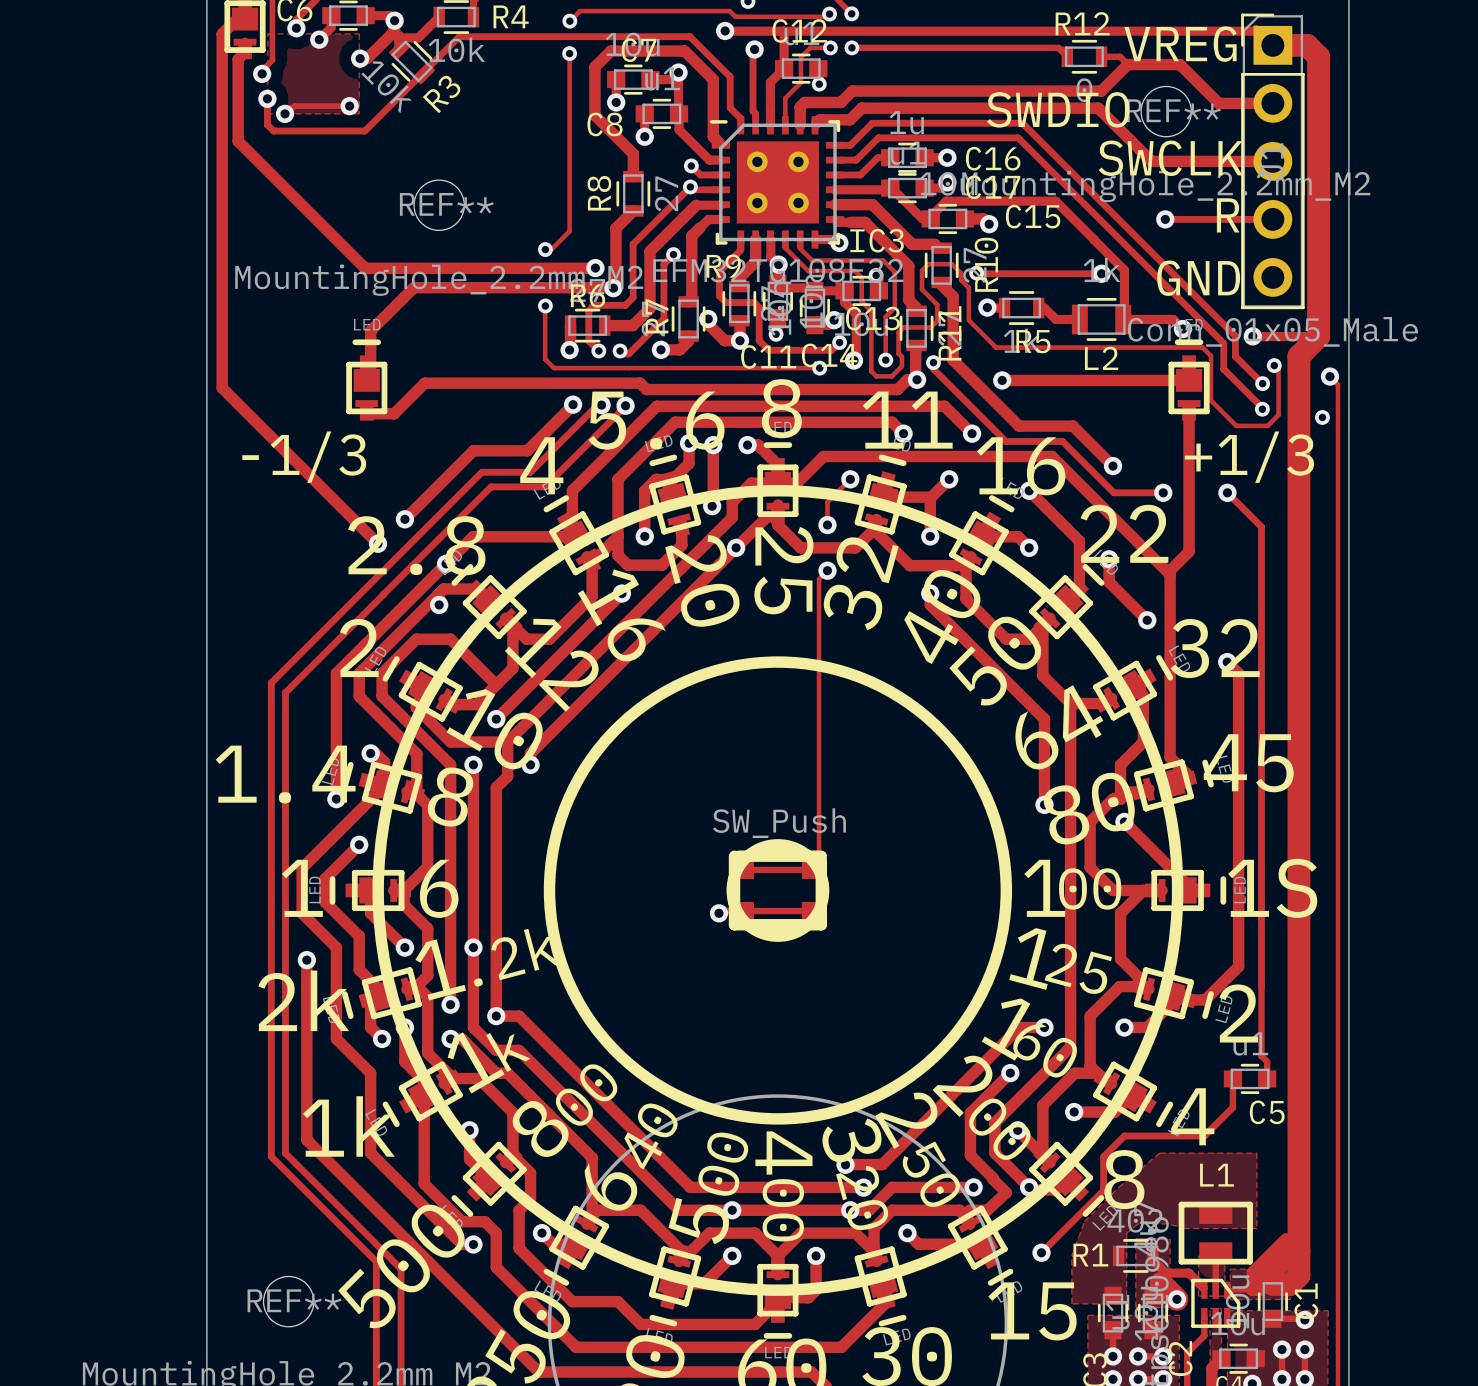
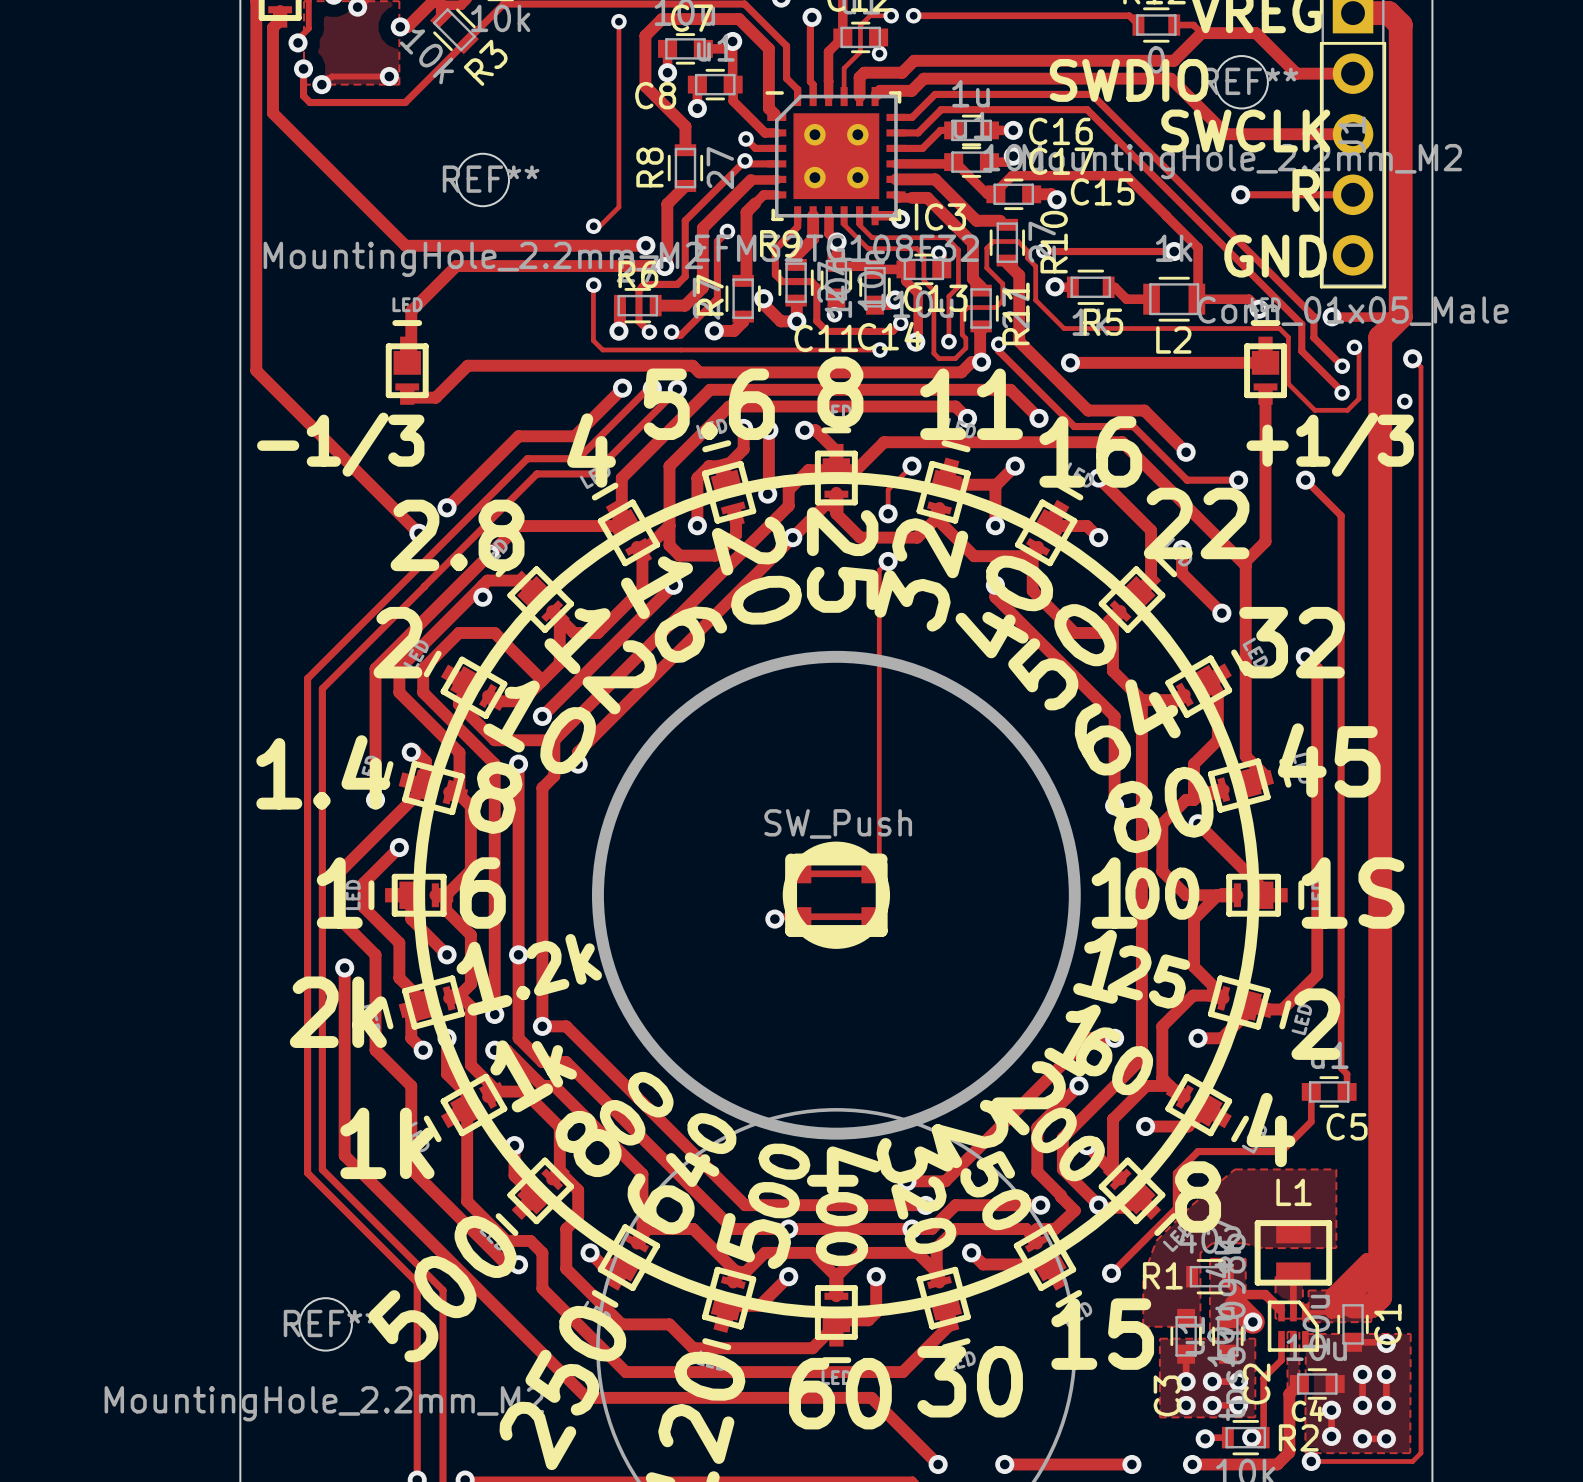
drawing shape: [543, 656, 1013, 1125] -> [592, 650, 1081, 1140]

